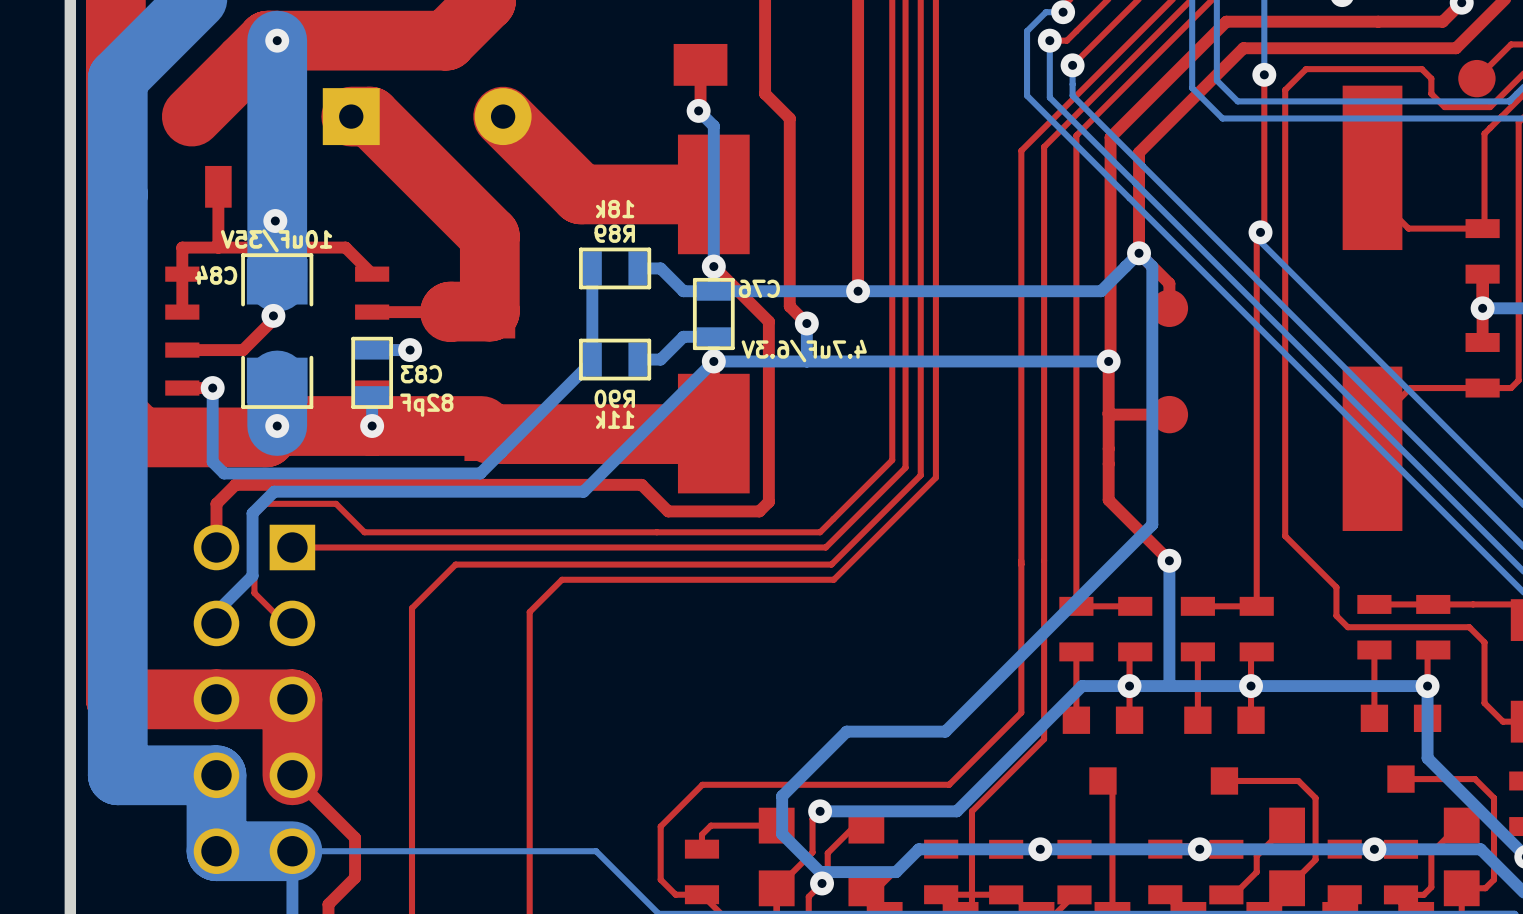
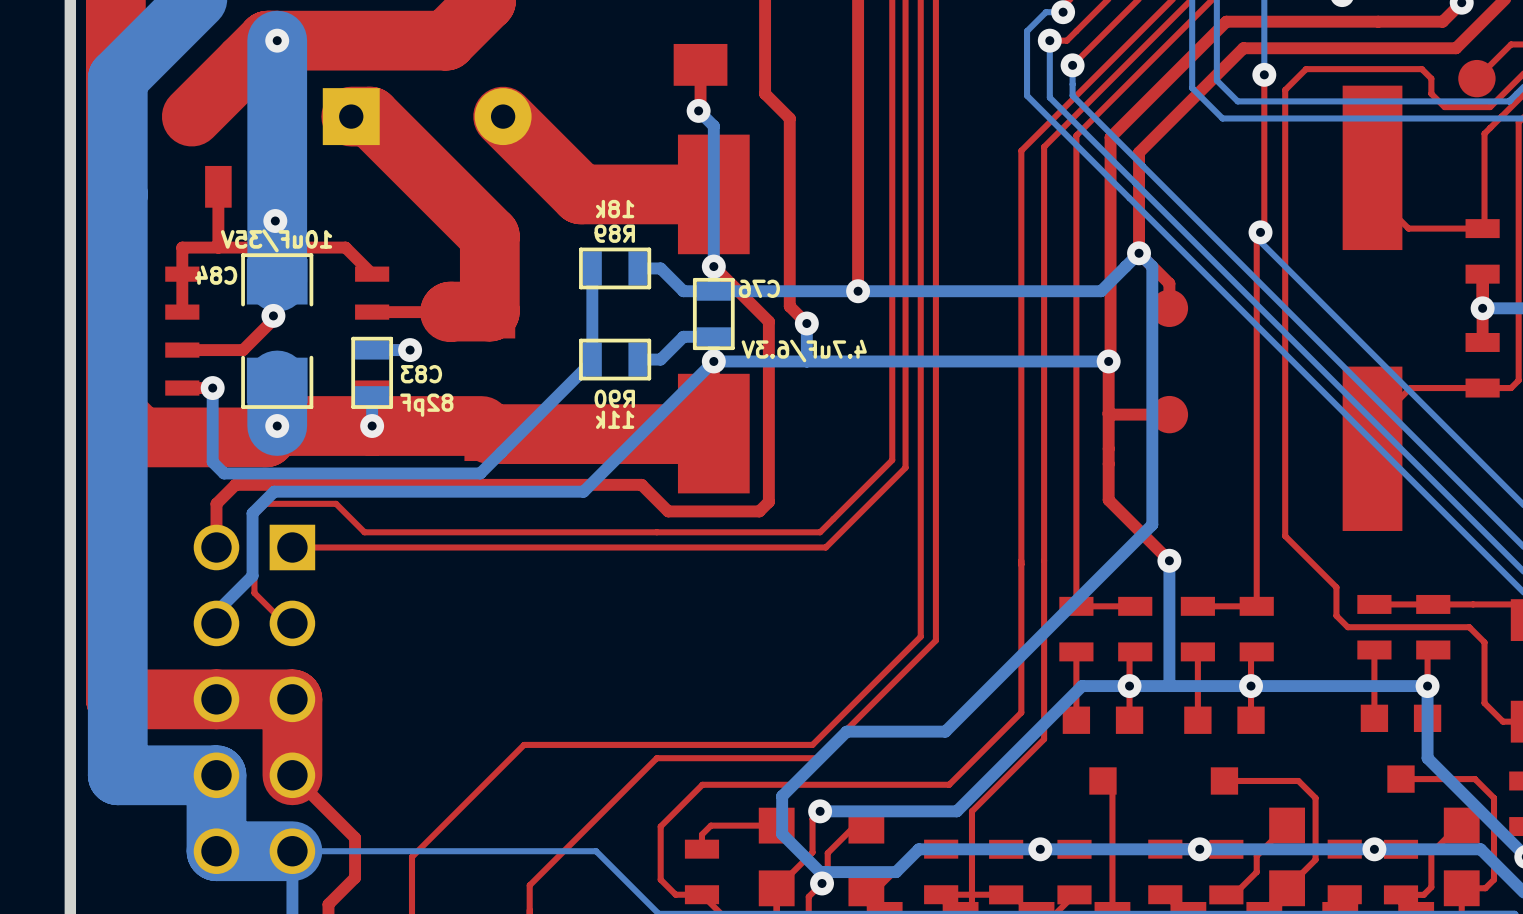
top track: (920, 475) (831, 564) (455, 564) (412, 608) (412, 856) -> (920, 475) (920, 636) (812, 744) (524, 744) (412, 856)
top track: (935, 477) (833, 579) (561, 579) (529, 612) (529, 885) -> (935, 477) (935, 640) (818, 758) (656, 758) (529, 885)

